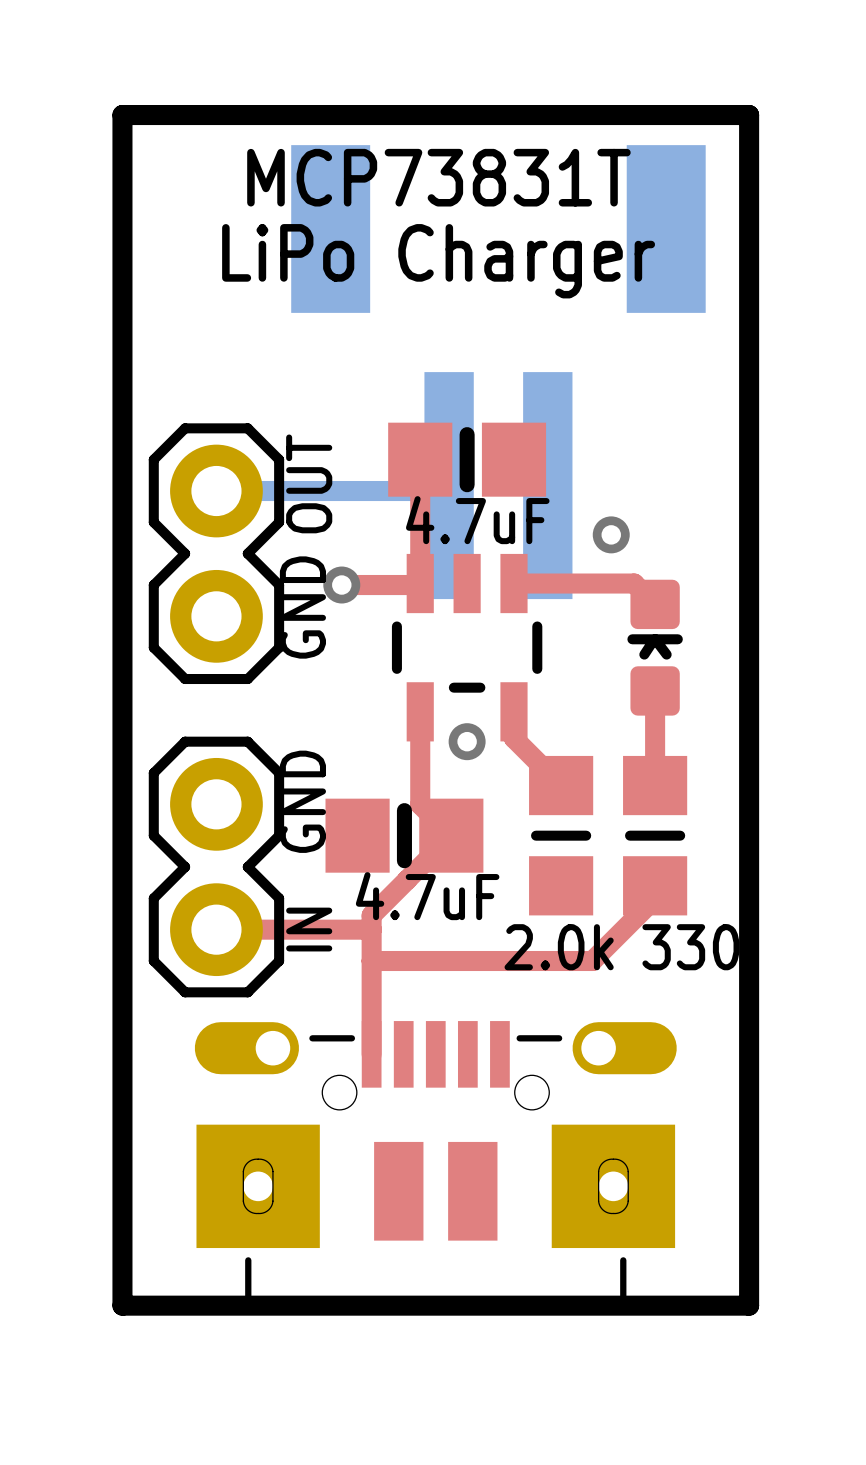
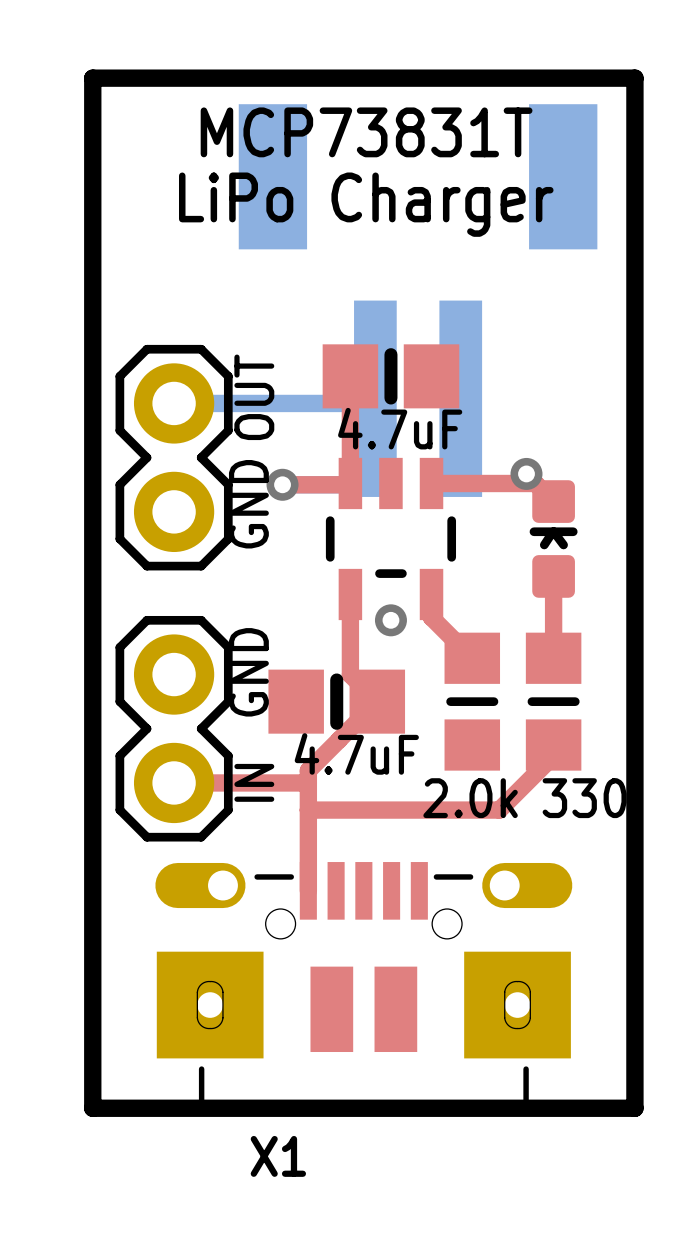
via position: (611, 534) -> (526, 473)
X1 name: none -> X1 (278, 1156)

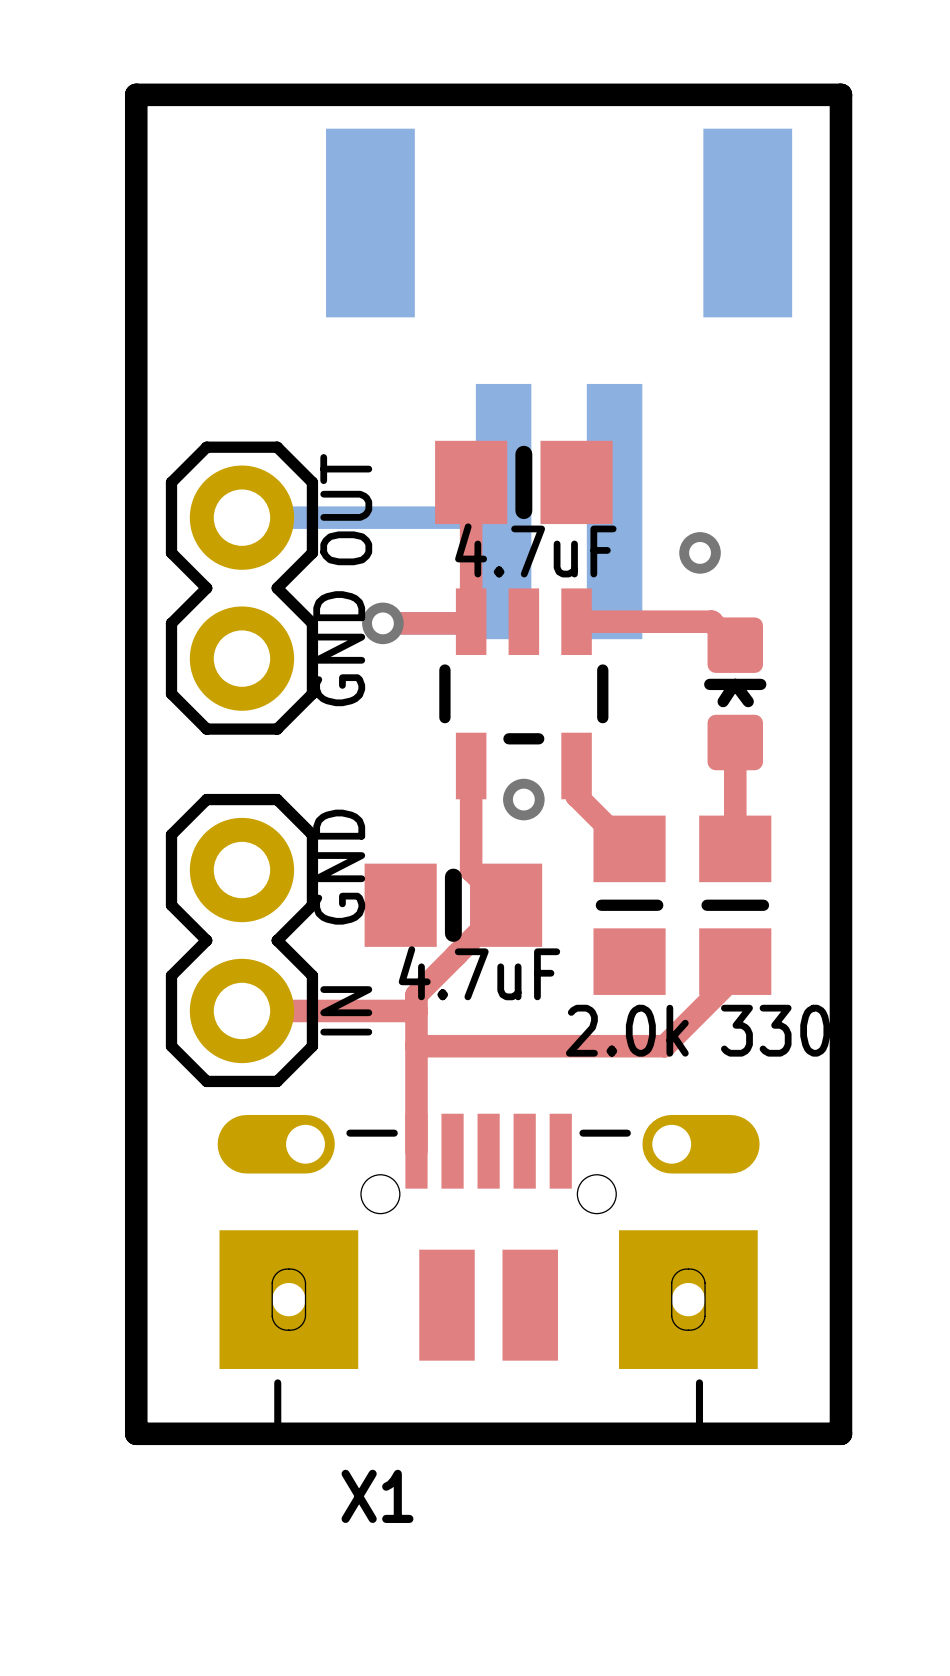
text: MCP73831T (366, 132) -> none
text: LiPo Charger (366, 204) -> none
via position: (526, 473) -> (700, 552)

